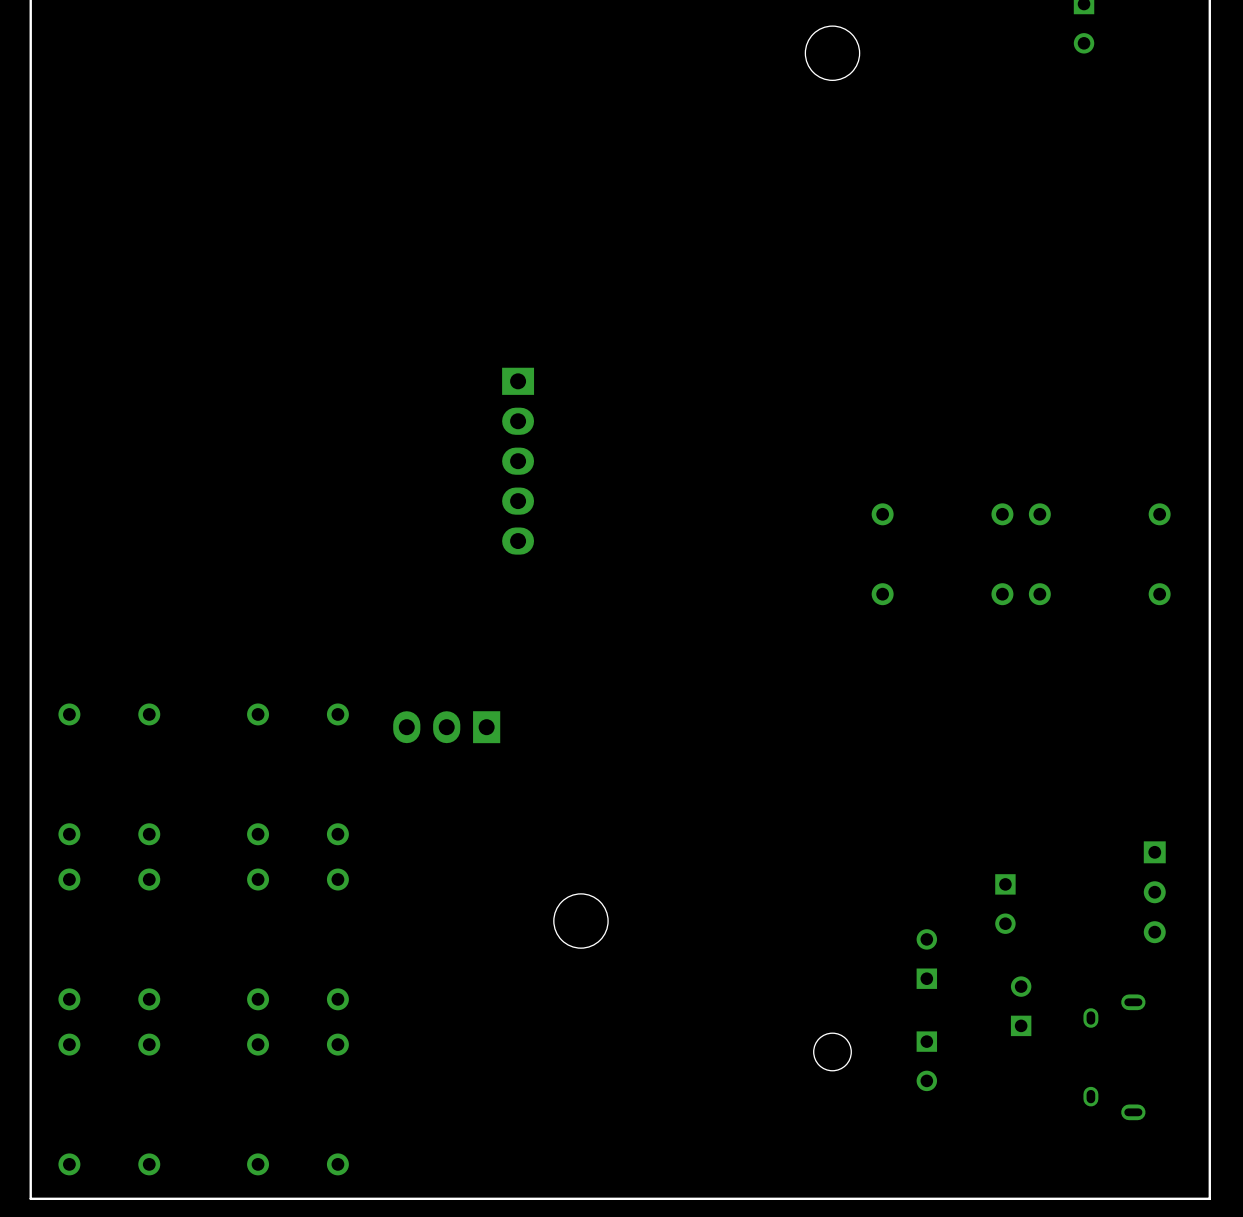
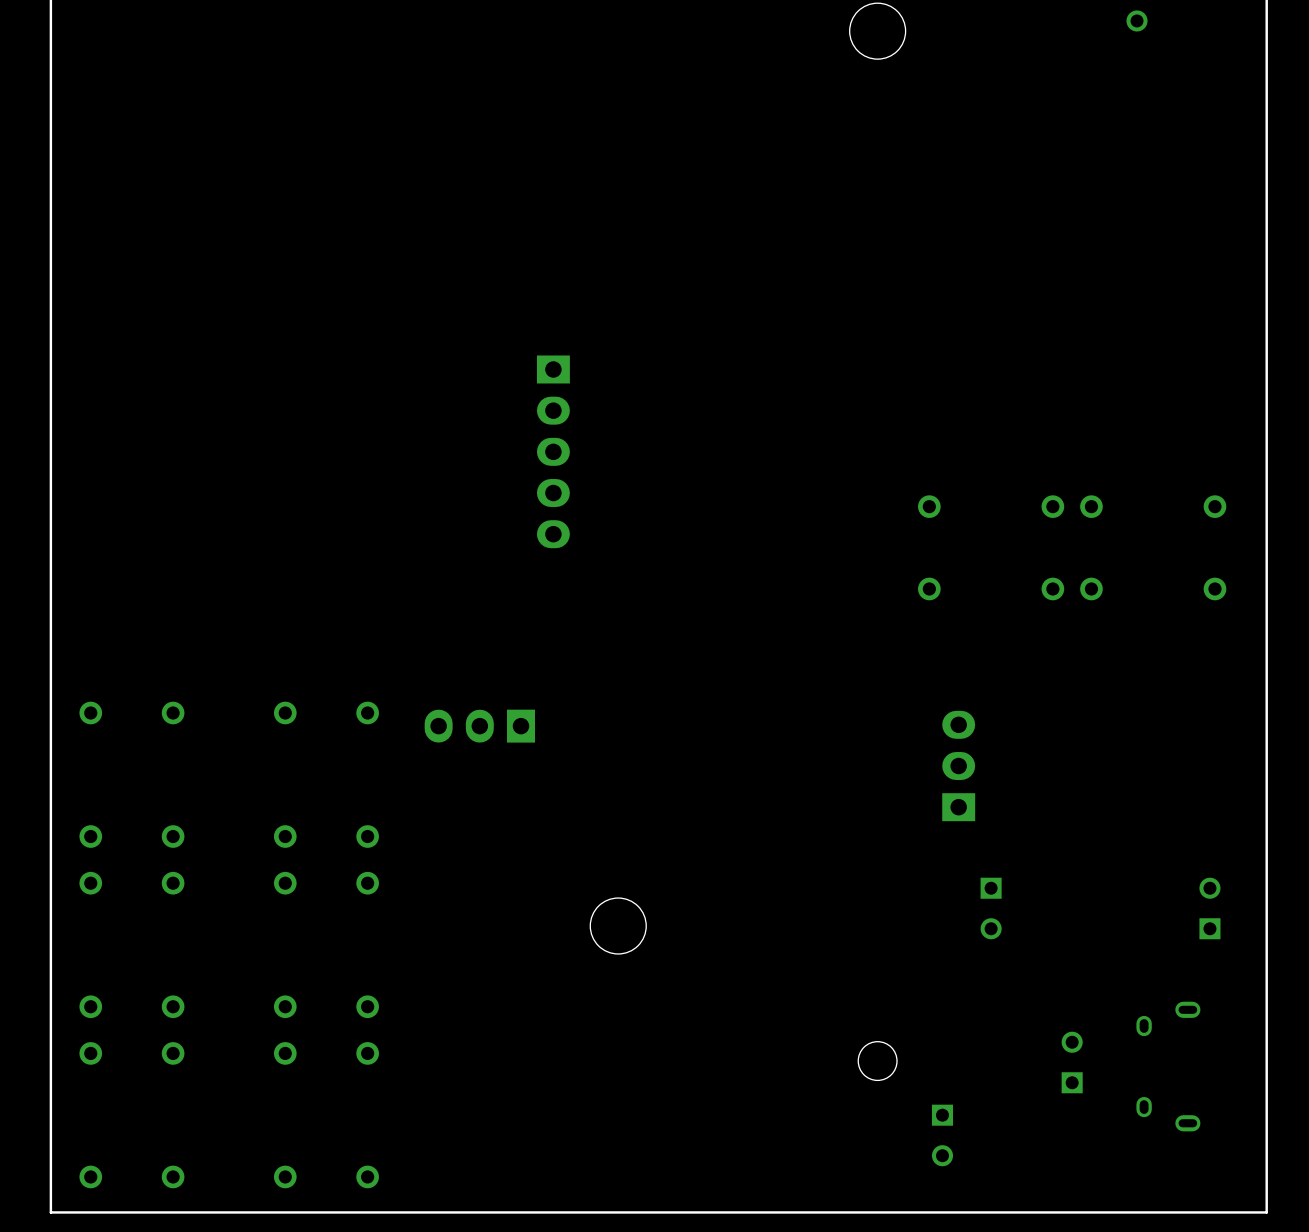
part: none -> (958, 766)
part footprint: [1143, 841, 1166, 944] -> [1199, 877, 1221, 940]
part: none -> (991, 908)
part: (1005, 904) -> none
part: (926, 959) -> none
part position: (1021, 1006) -> (1072, 1062)
part: (926, 1061) -> none
part: none -> (942, 1135)

